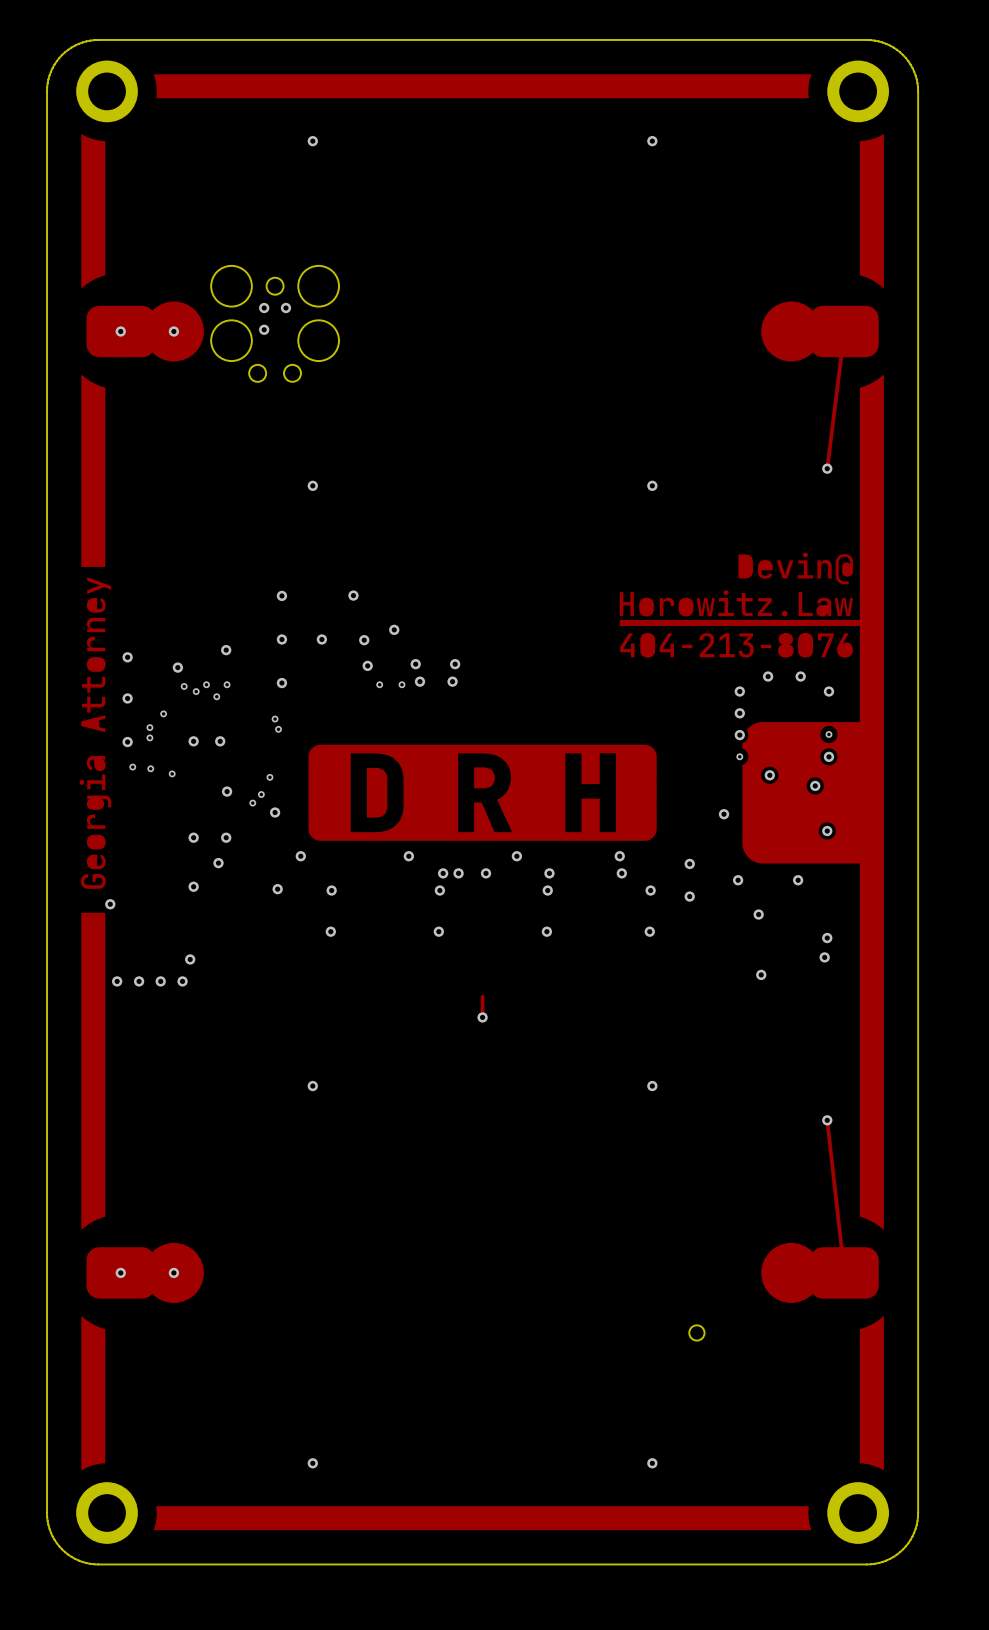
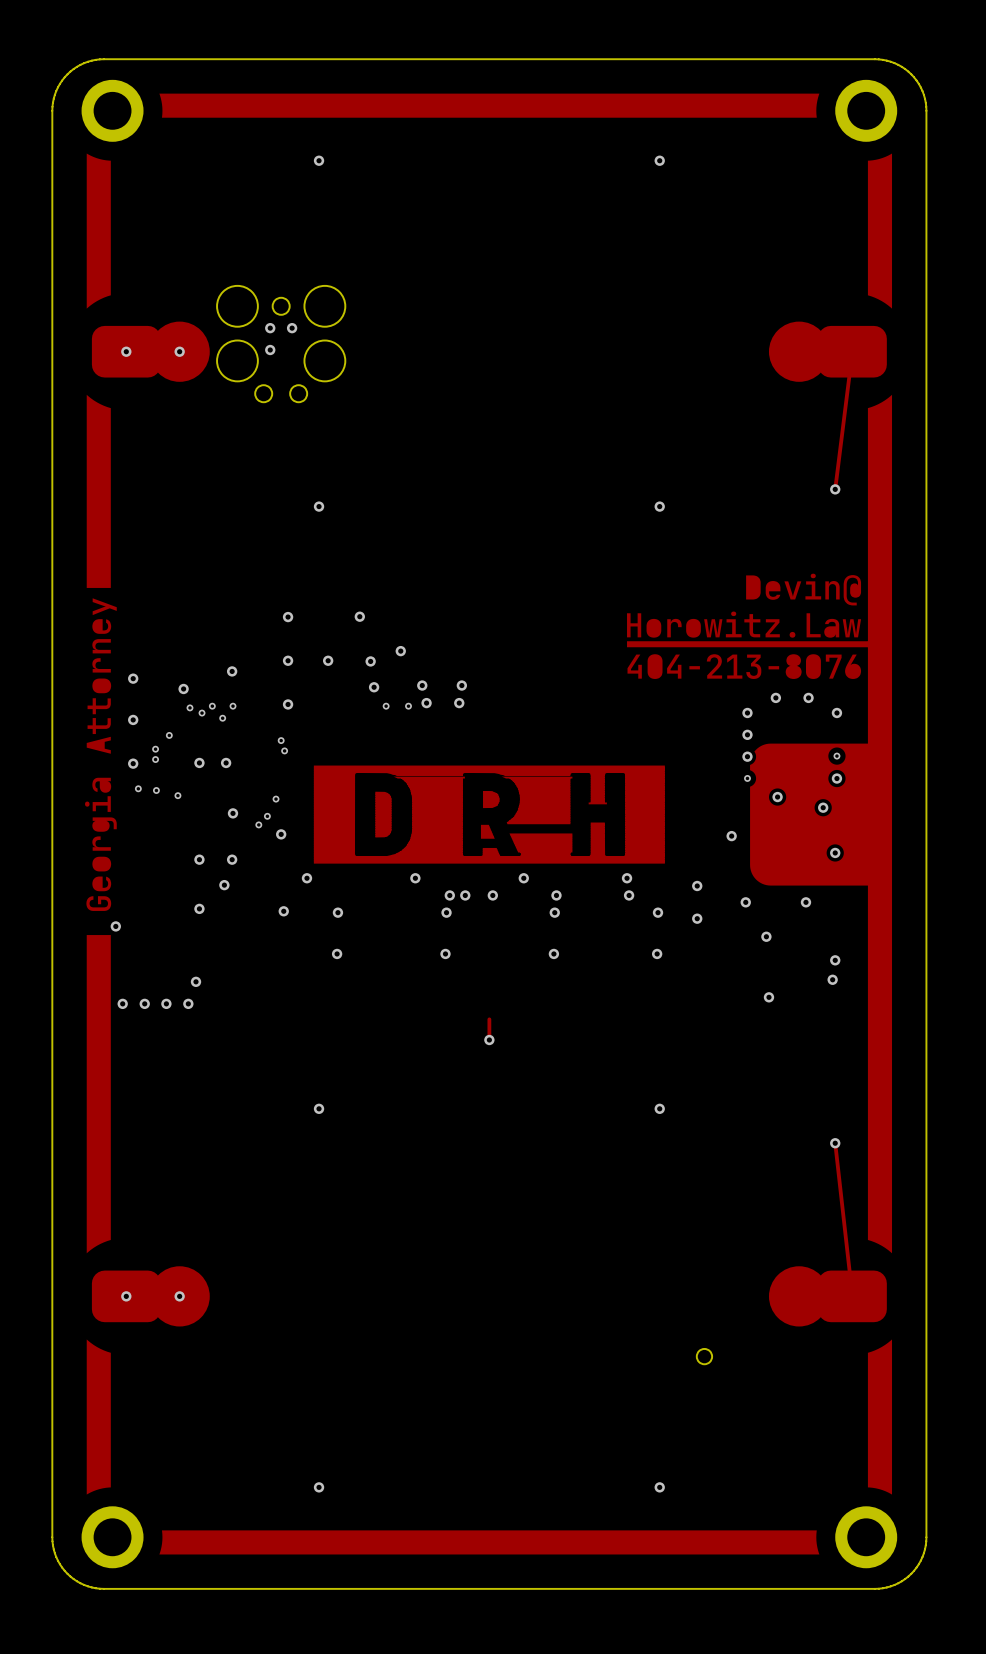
drawing: none -> [313, 765, 665, 864]
drawing: [308, 744, 657, 841] -> none

